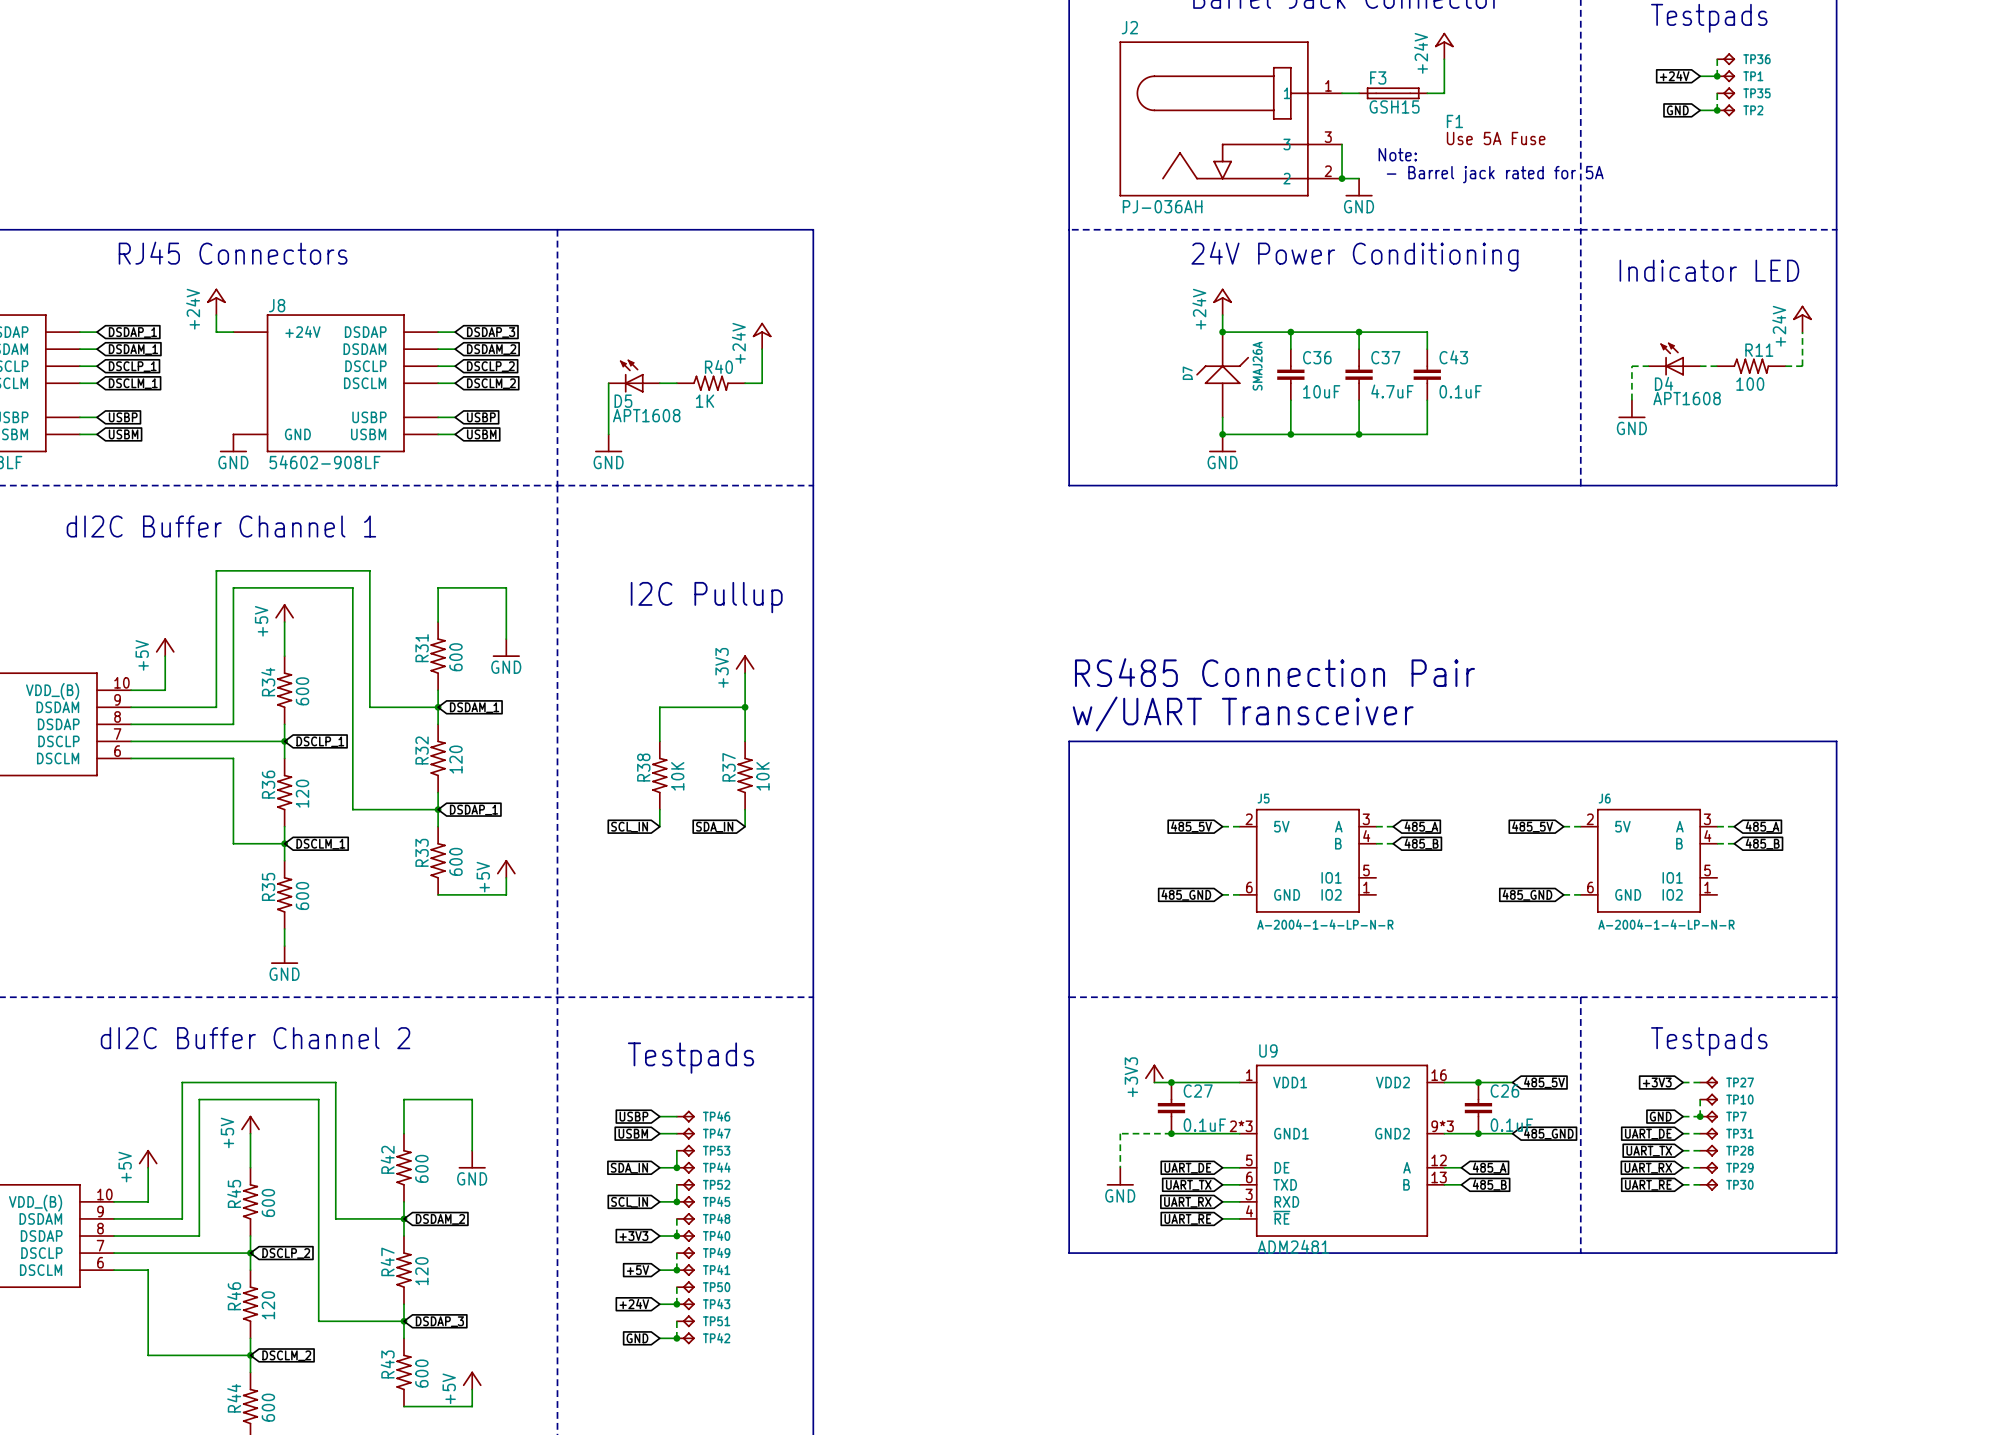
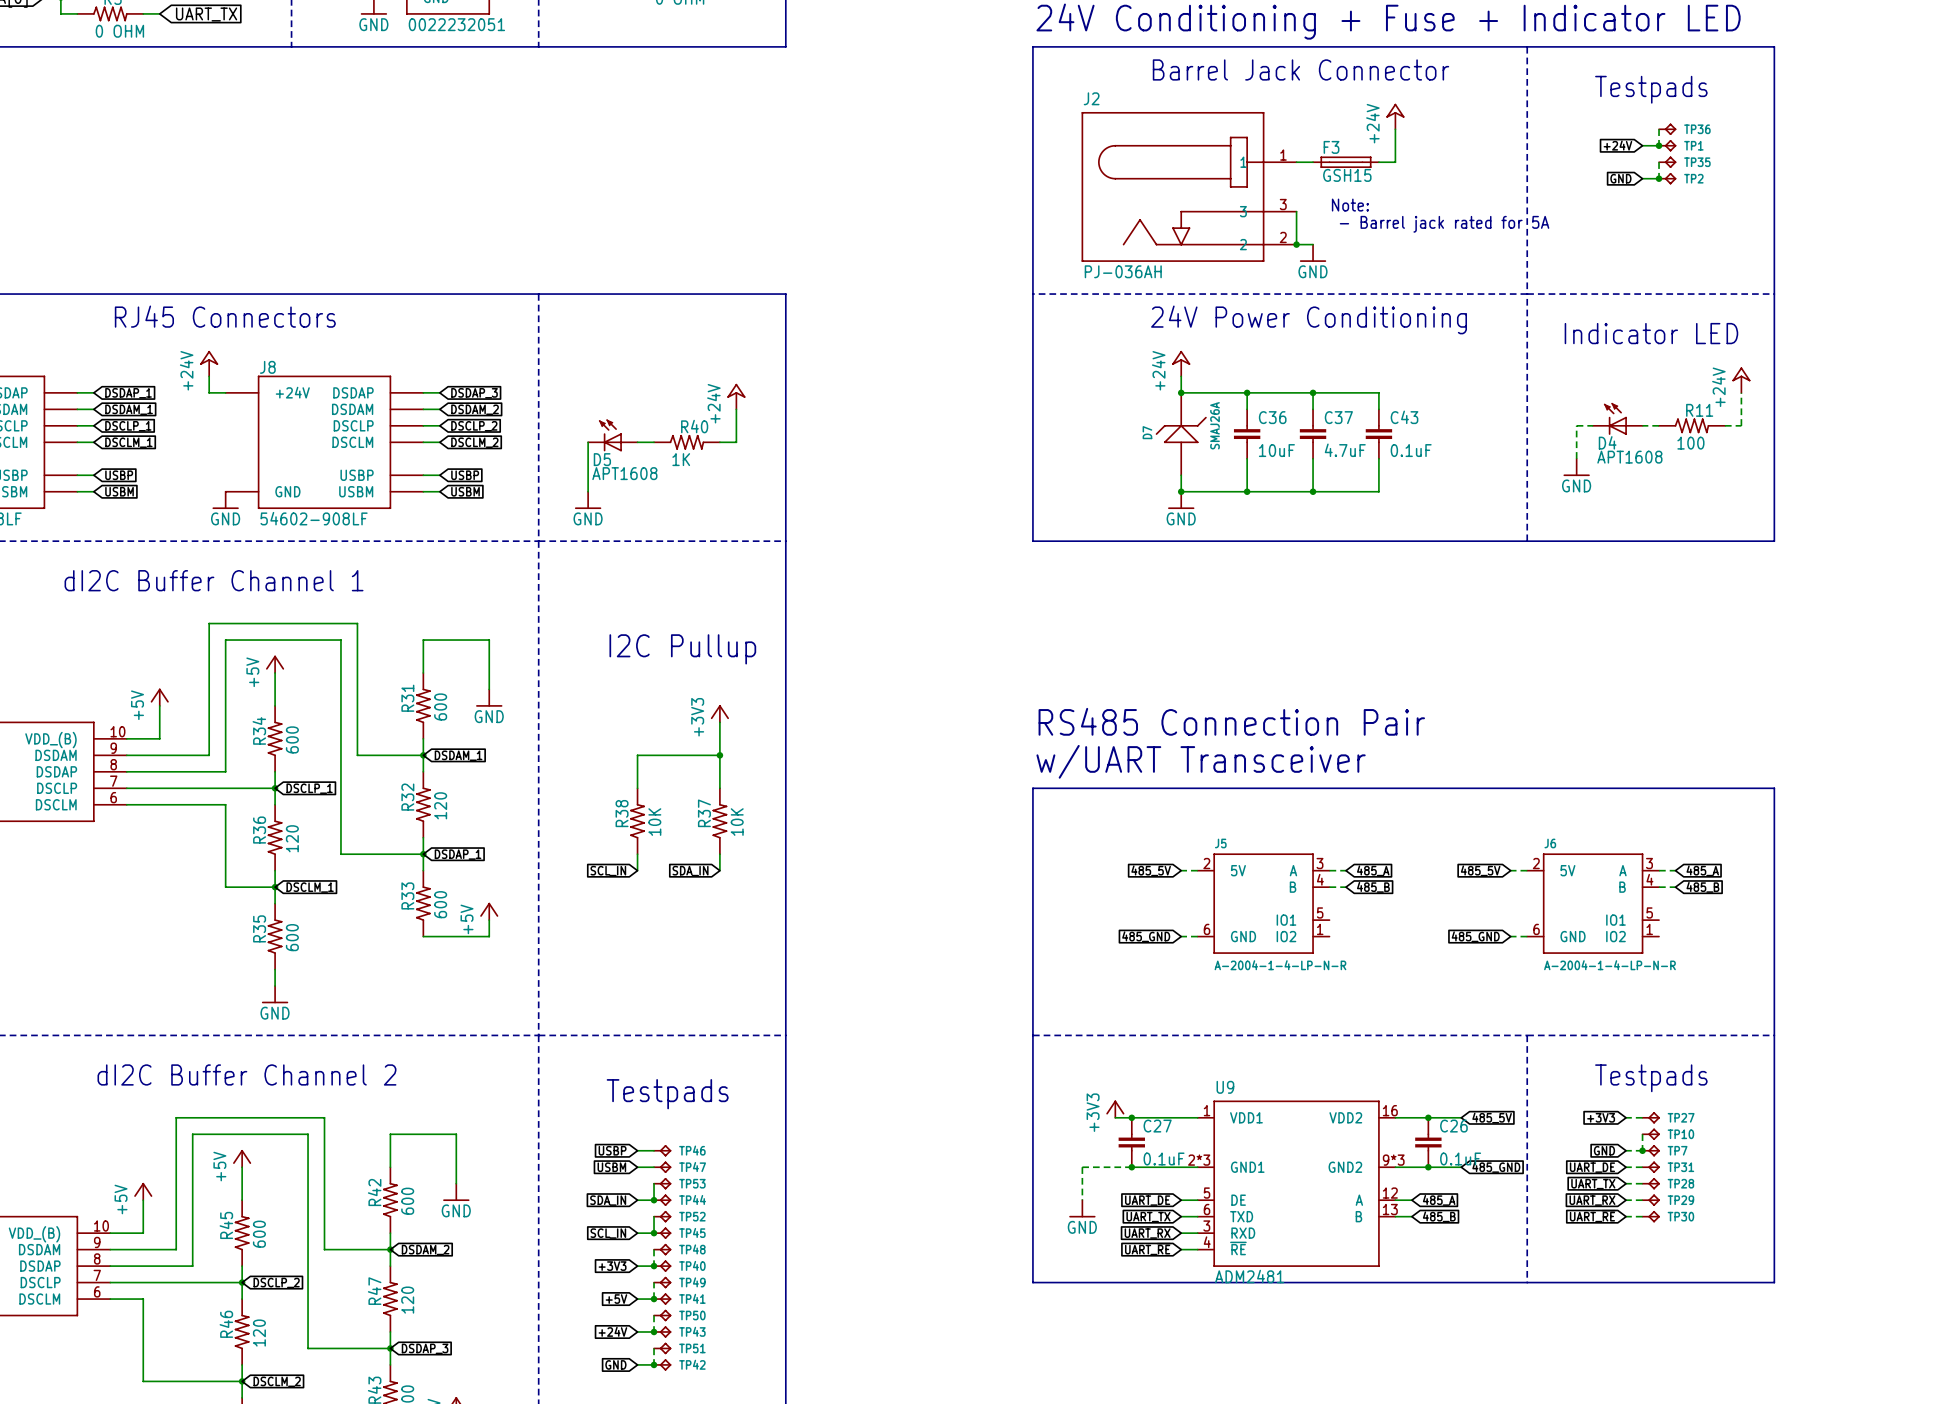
F1: Use 5A Fuse (1496, 129) -> none
text: none -> Note: (1350, 205)
text: Note: (1397, 154) -> - Barrel jack rated for 5A (1444, 224)
text: - Barrel jack rated for 5A (1495, 174) -> none

